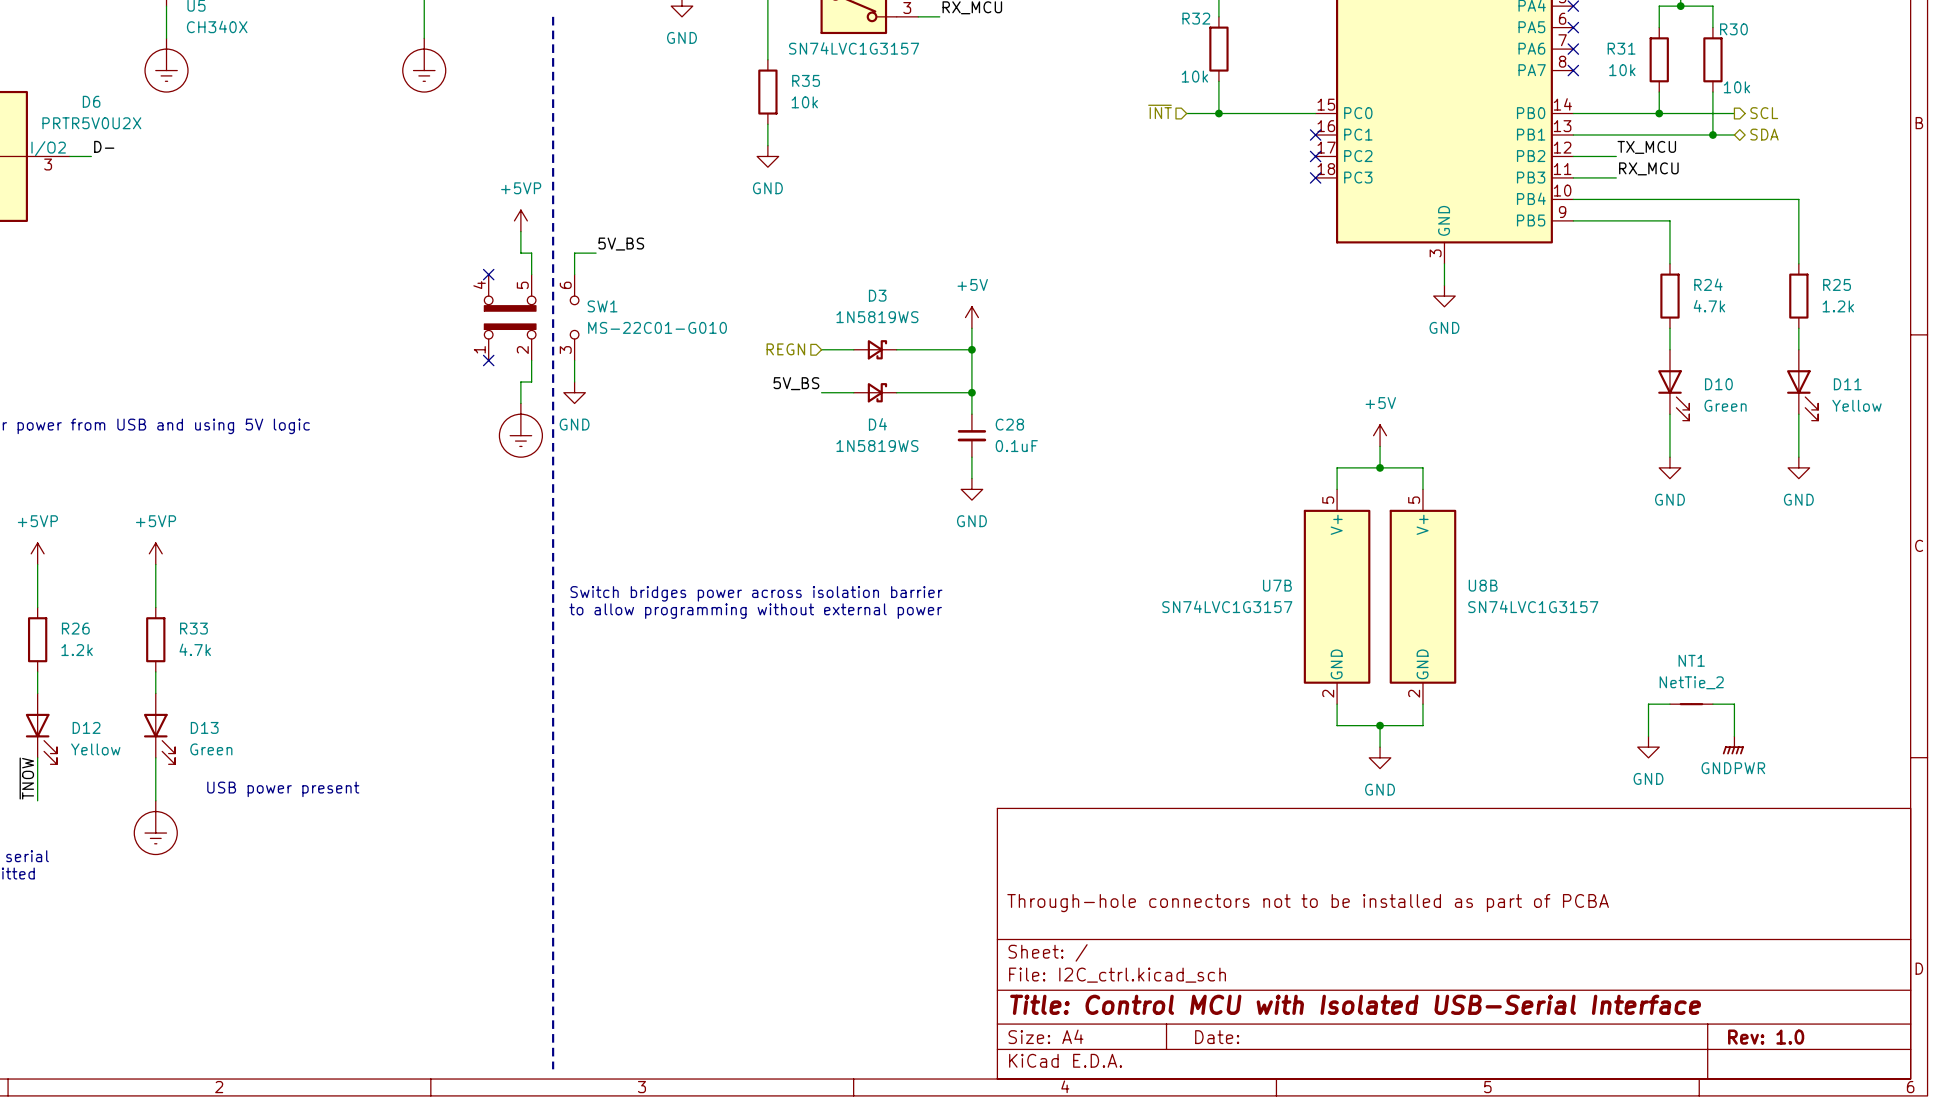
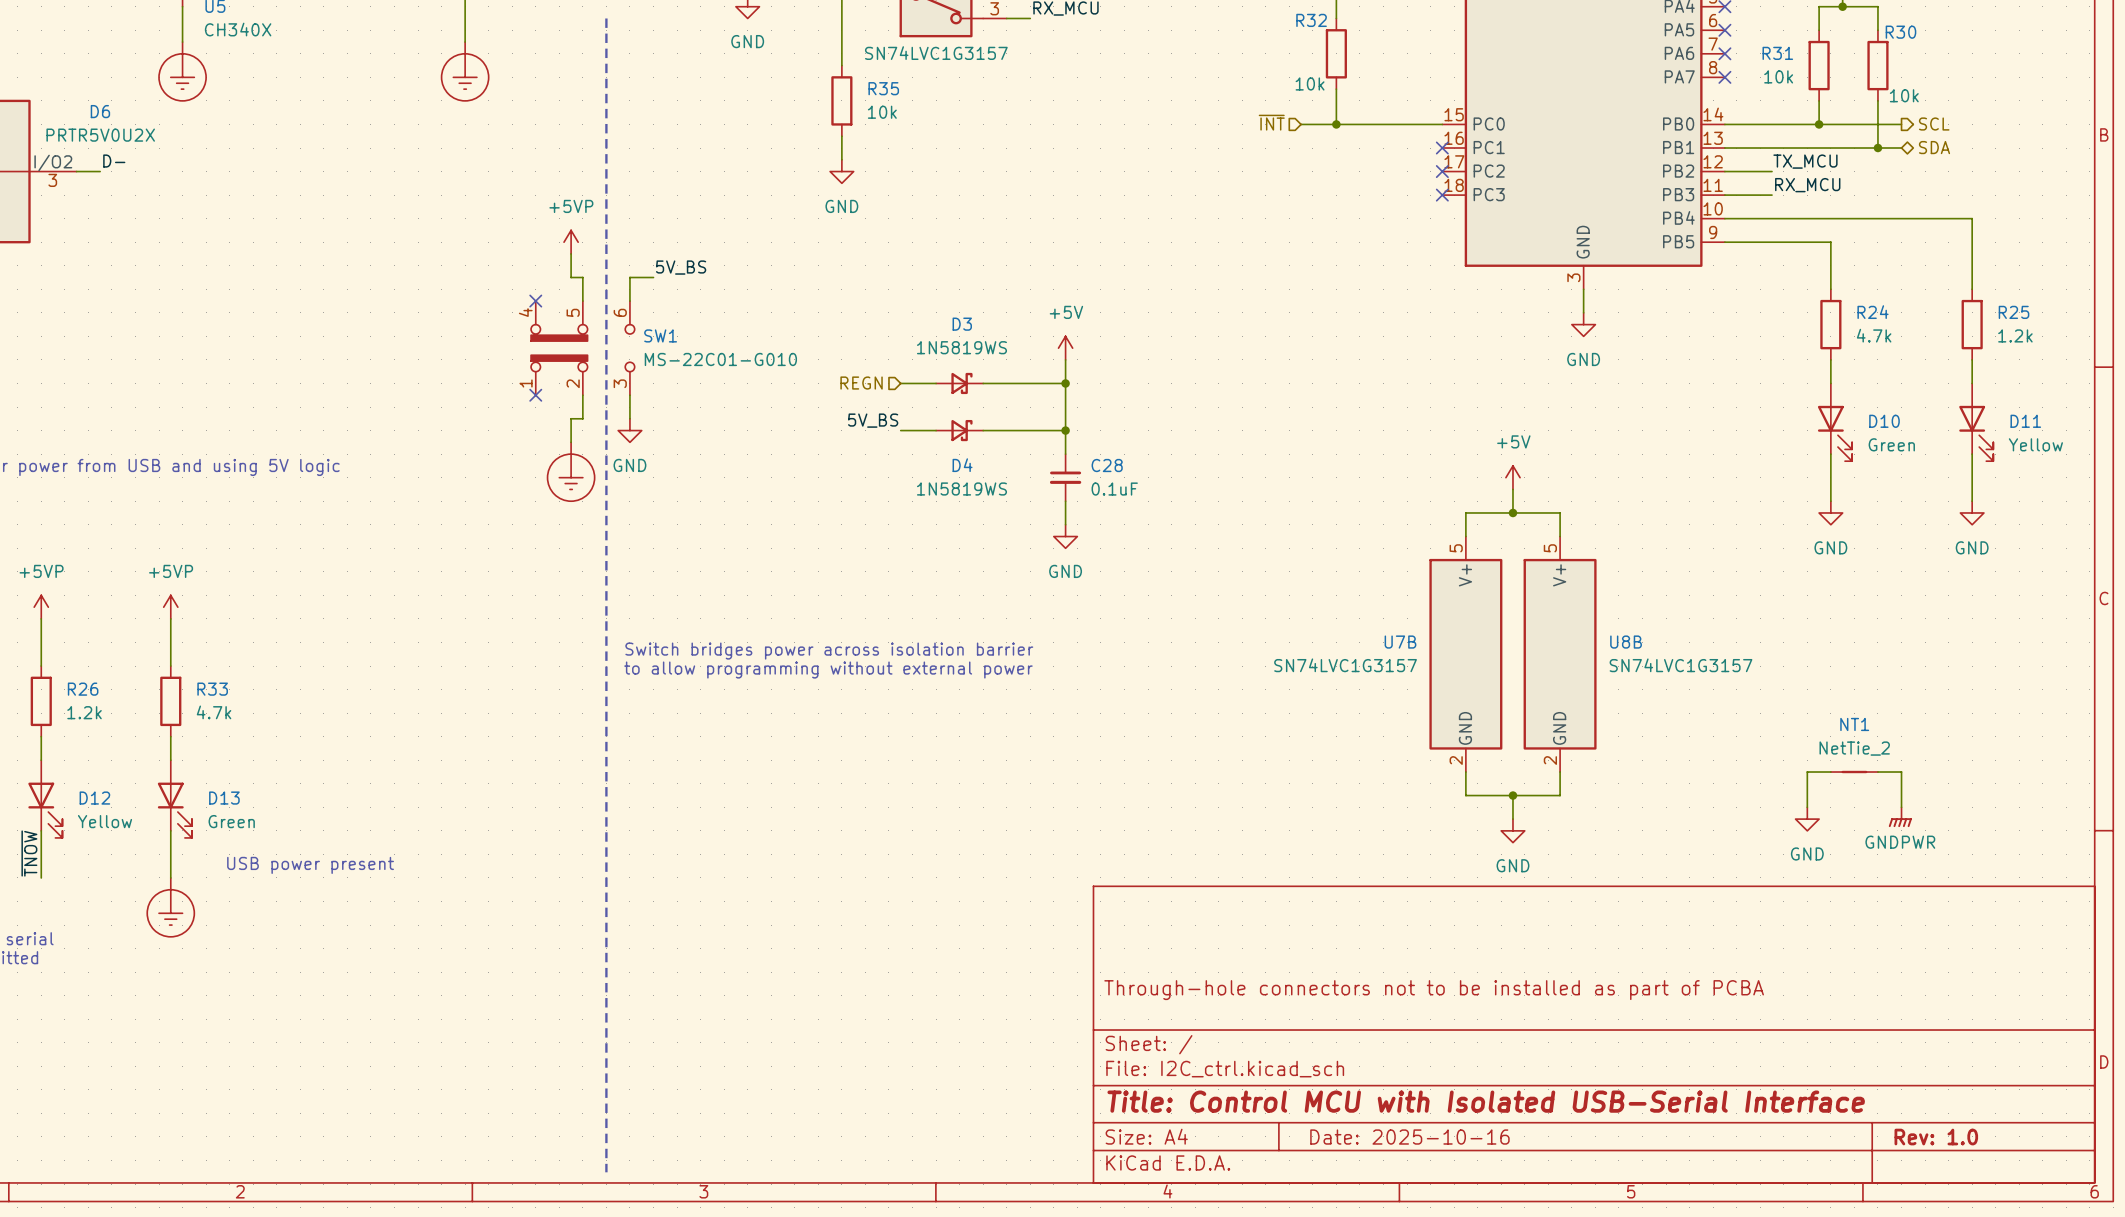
title block: Date: (1217, 1037) -> Date: 2025-10-16 (1409, 1137)

